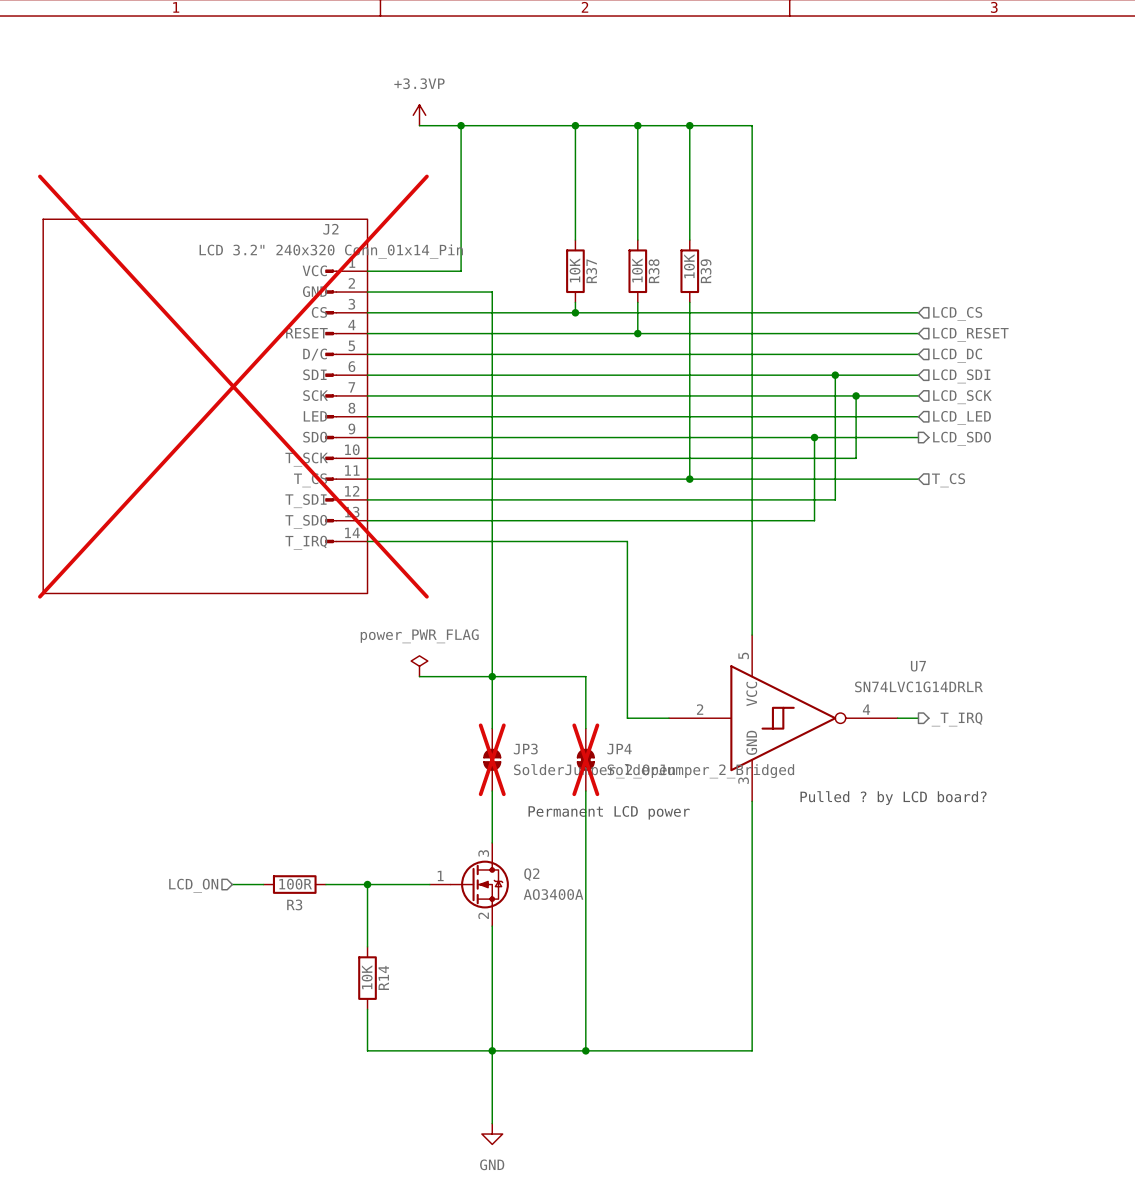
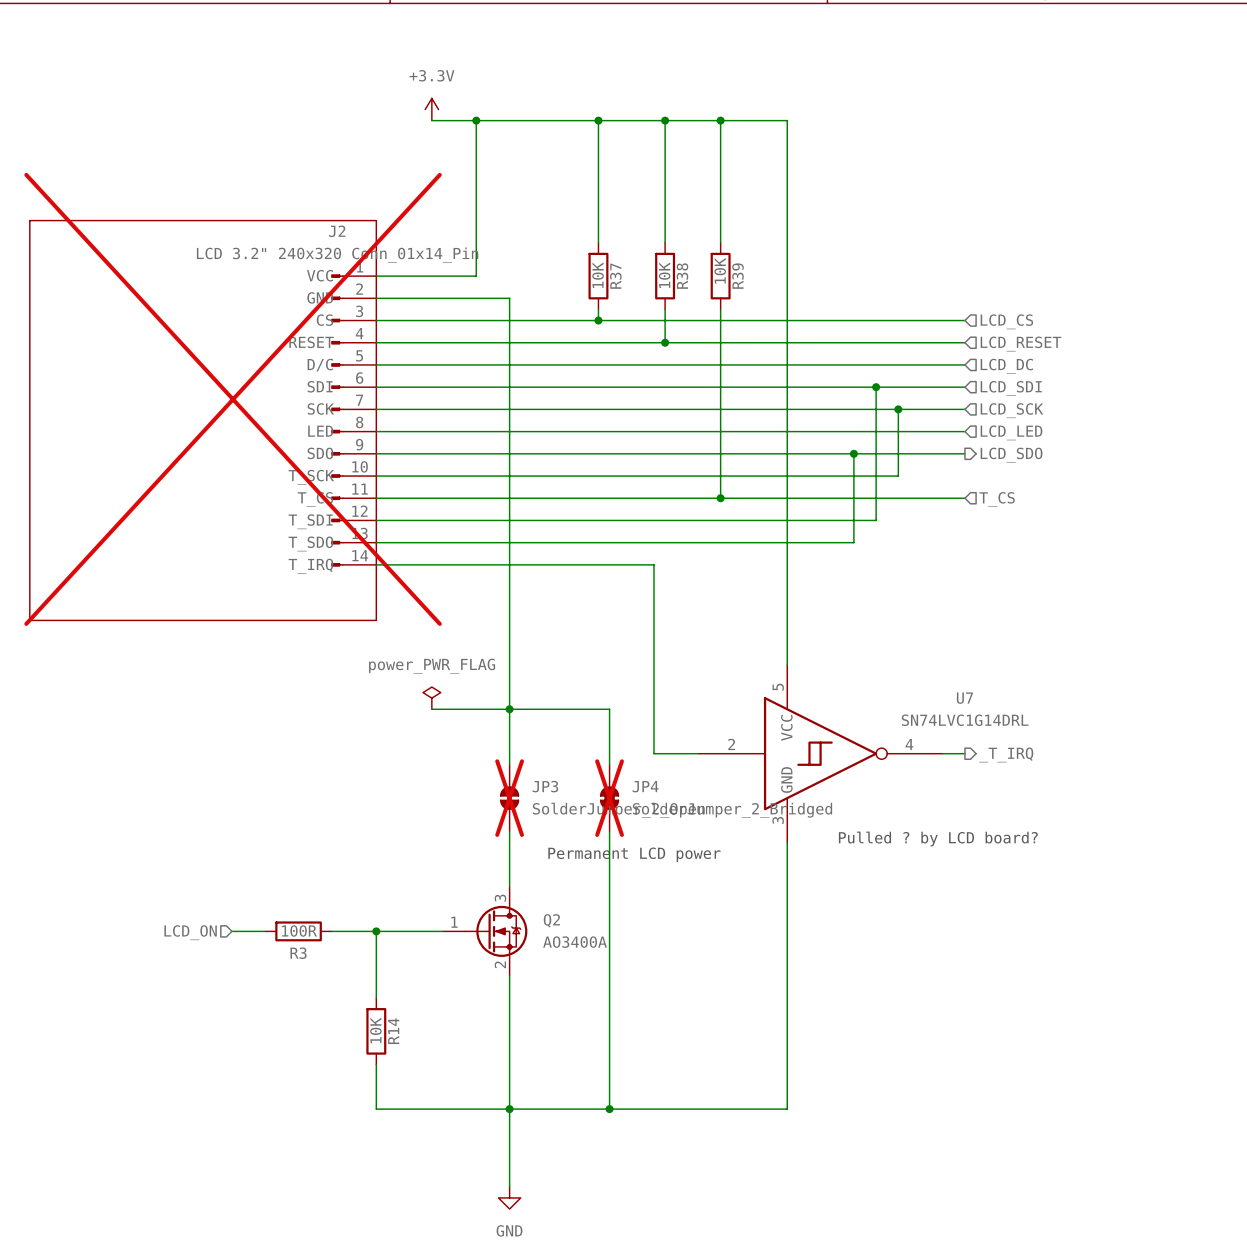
power symbol: +3.3VP (419, 115) -> +3.3V (431, 109)
U7 value: SN74LVC1G14DRLR (918, 686) -> SN74LVC1G14DRL (965, 720)

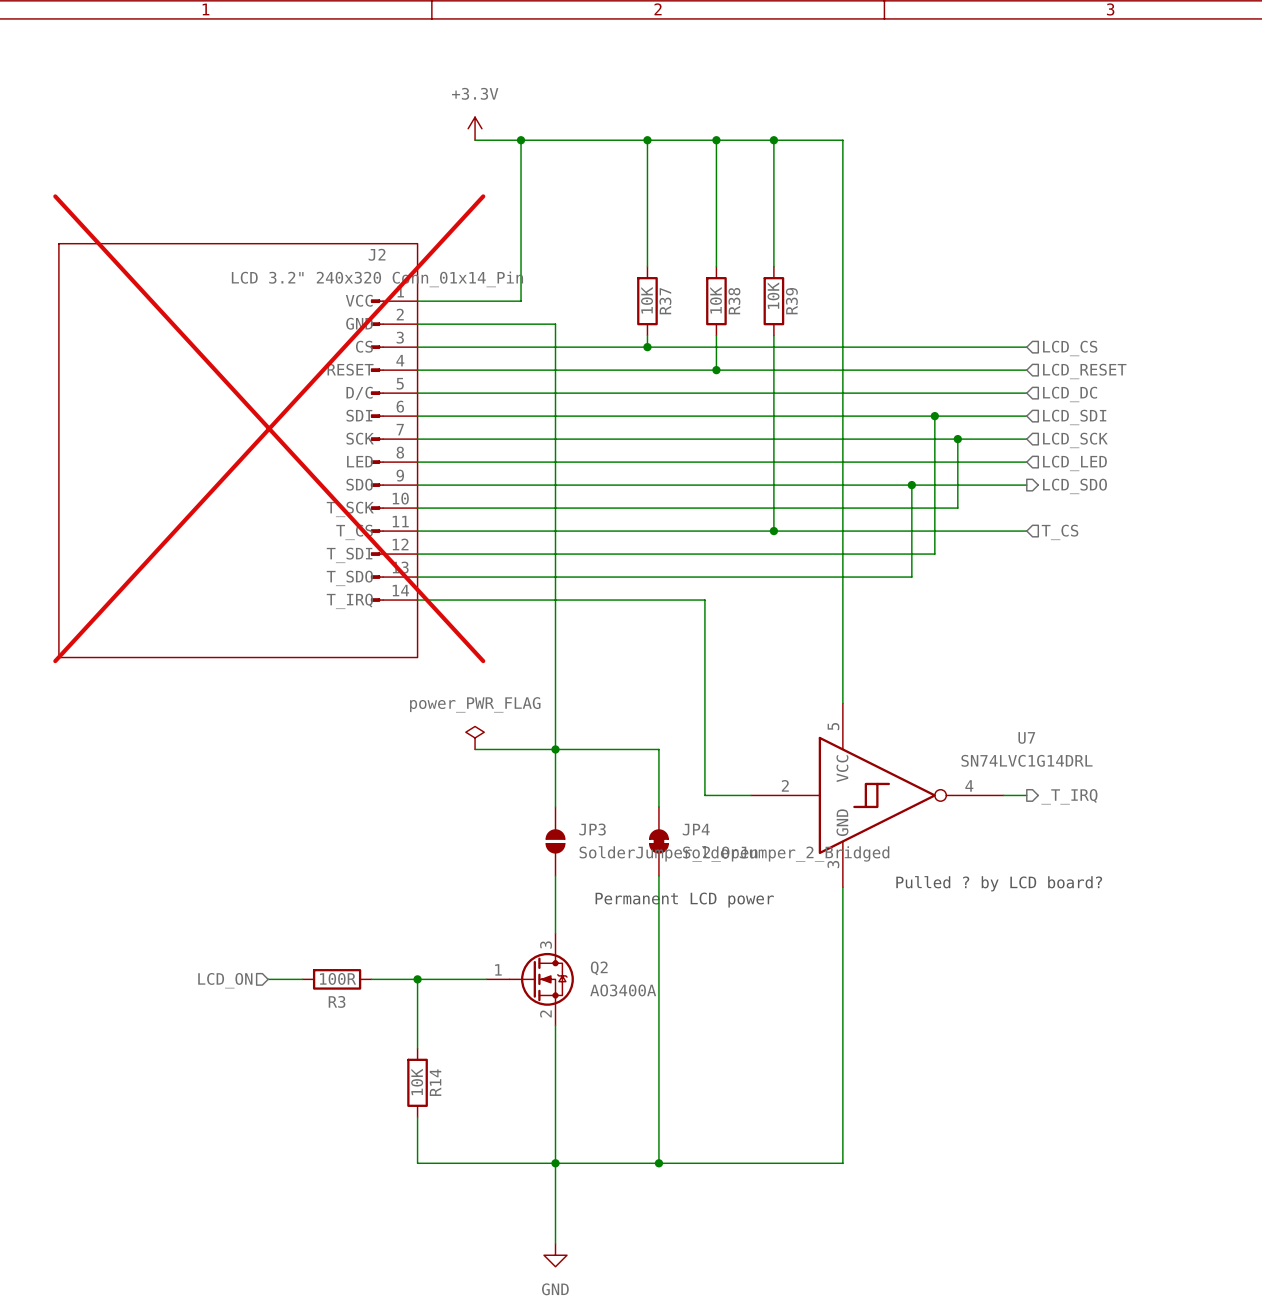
JP3 do-not-place cross: (509, 798) -> none
JP4 do-not-place cross: (609, 798) -> none

